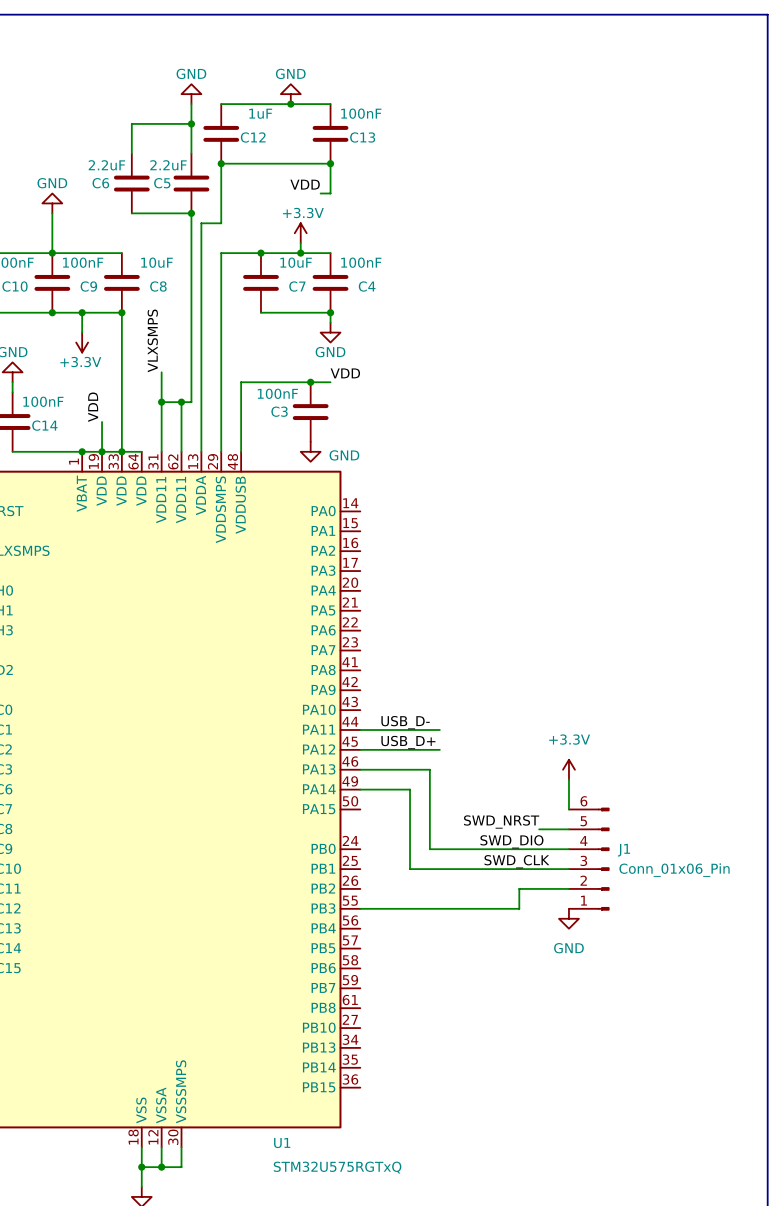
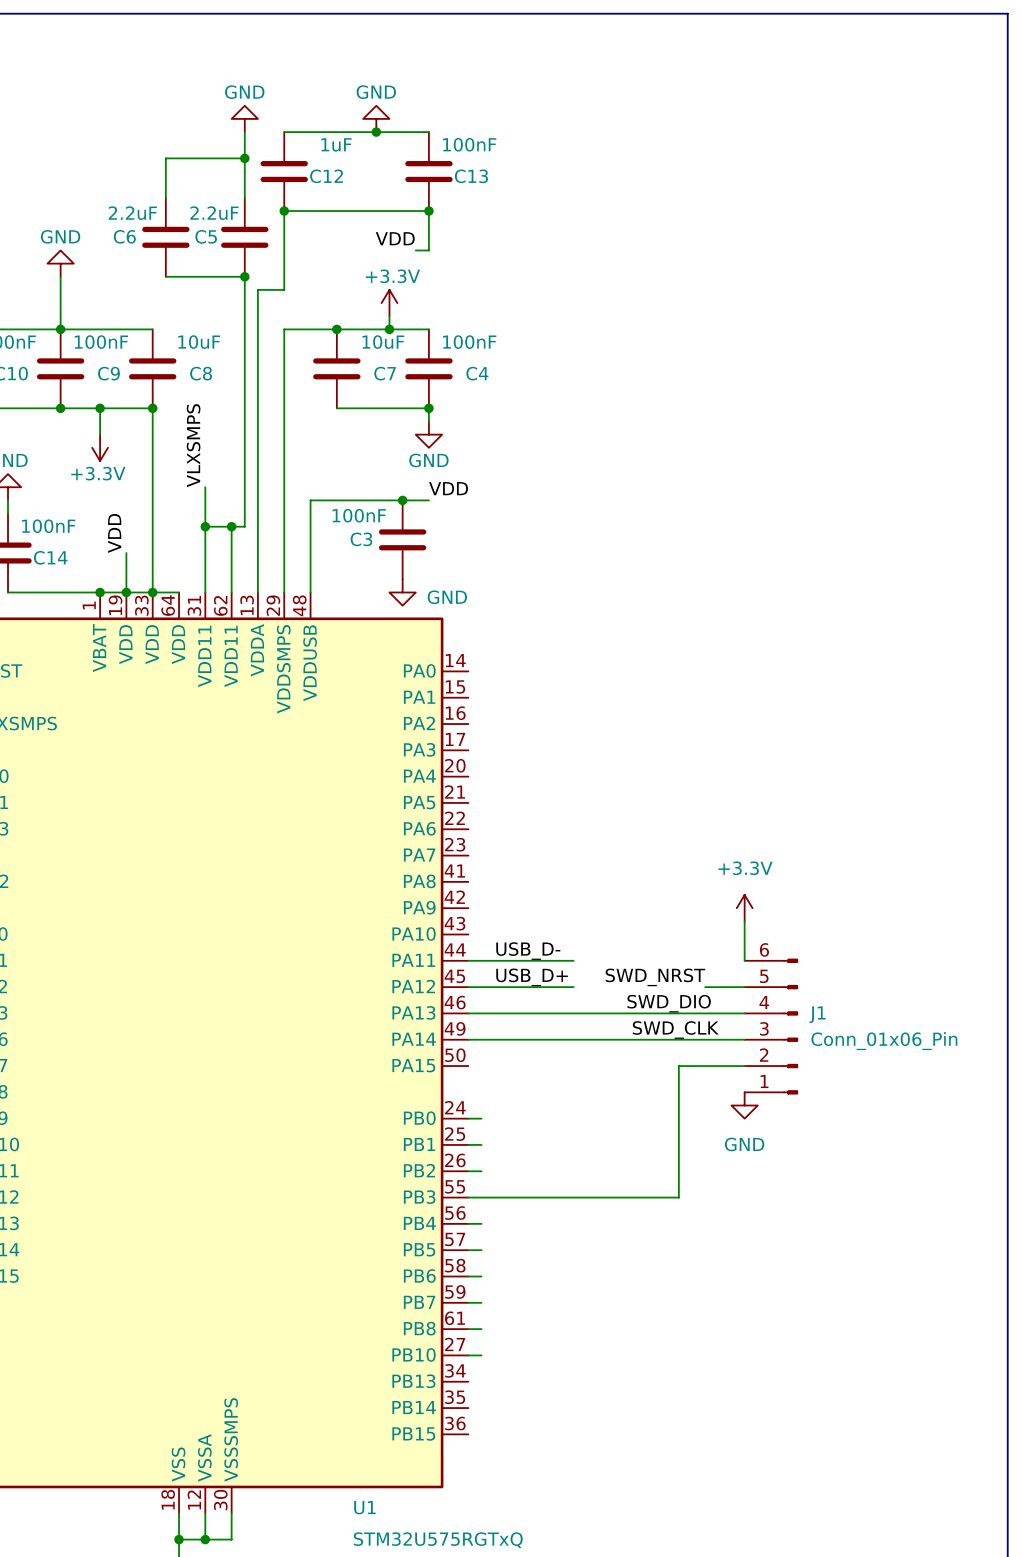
wire: (429, 769) (429, 849) (568, 849) -> (560, 1013) (744, 1013)
power symbol position: +3.3V (568, 769) -> +3.3V (744, 908)
wire: (568, 779) (568, 809) -> (744, 921) (744, 960)
wire: (410, 789) (410, 869) (568, 869) -> (534, 1039) (744, 1039)
label position: SWD_NRST (501, 822) -> SWD_NRST (655, 977)
wire: (539, 829) (568, 829) -> (705, 987) (744, 987)
label position: SWD_DIO (511, 841) -> SWD_DIO (669, 1003)
wire: none -> (468, 1118) (481, 1118)
J1 position: (589, 859) -> (771, 1026)
label position: SWD_CLK (516, 861) -> SWD_CLK (675, 1030)
wire: none -> (468, 1144) (481, 1144)
wire: none -> (468, 1171) (481, 1171)
wire: (519, 888) (568, 888) -> (678, 1171) (678, 1066) (744, 1066)
power symbol position: GND (568, 918) -> GND (744, 1105)
wire: none -> (468, 1223) (481, 1223)
wire: none -> (468, 1250) (481, 1250)
wire: none -> (468, 1276) (481, 1276)
wire: none -> (468, 1302) (481, 1302)
wire: none -> (468, 1329) (481, 1329)
wire: none -> (468, 1355) (481, 1355)

